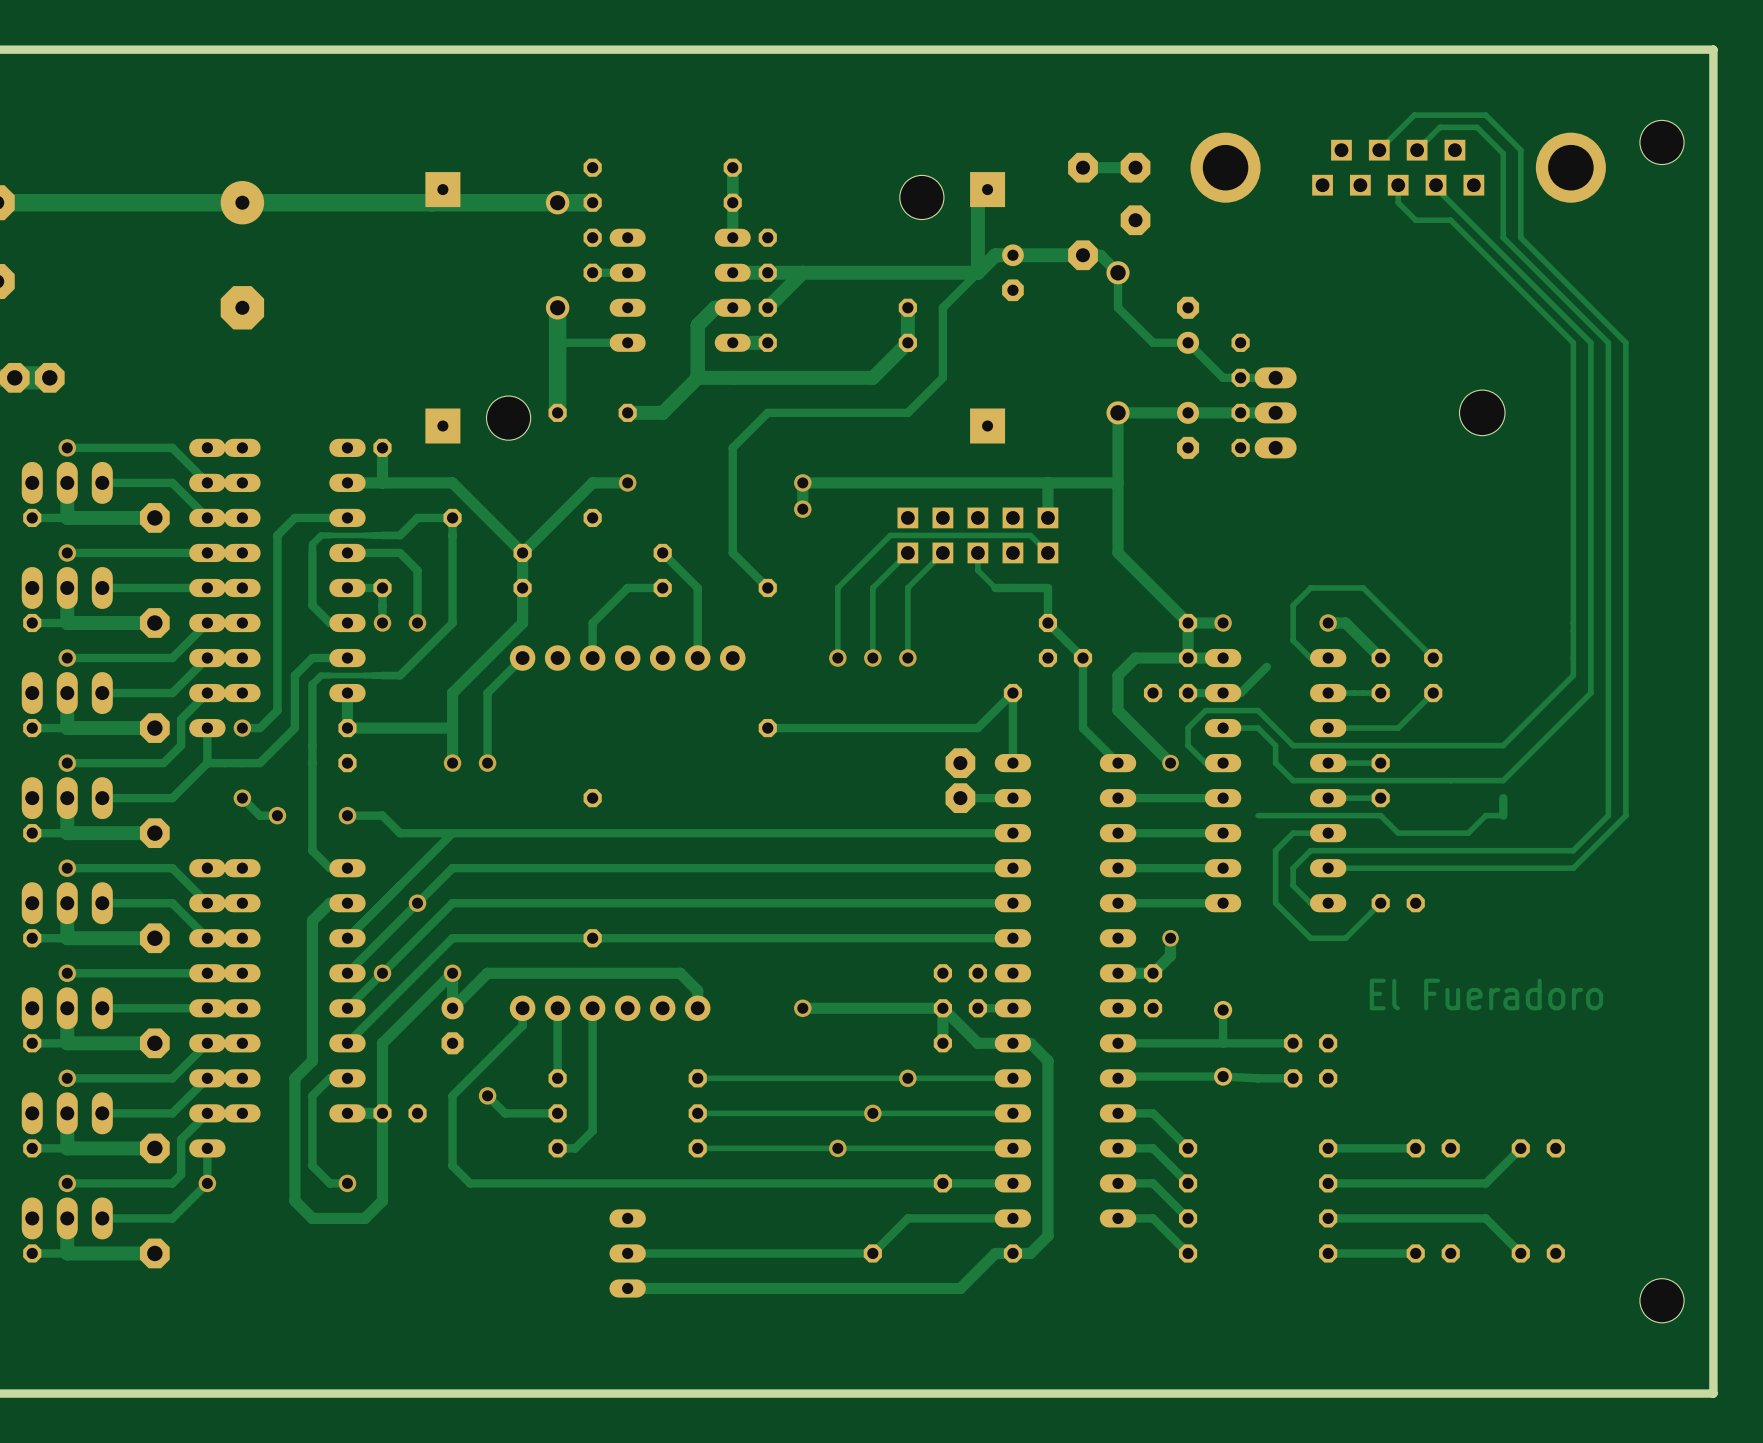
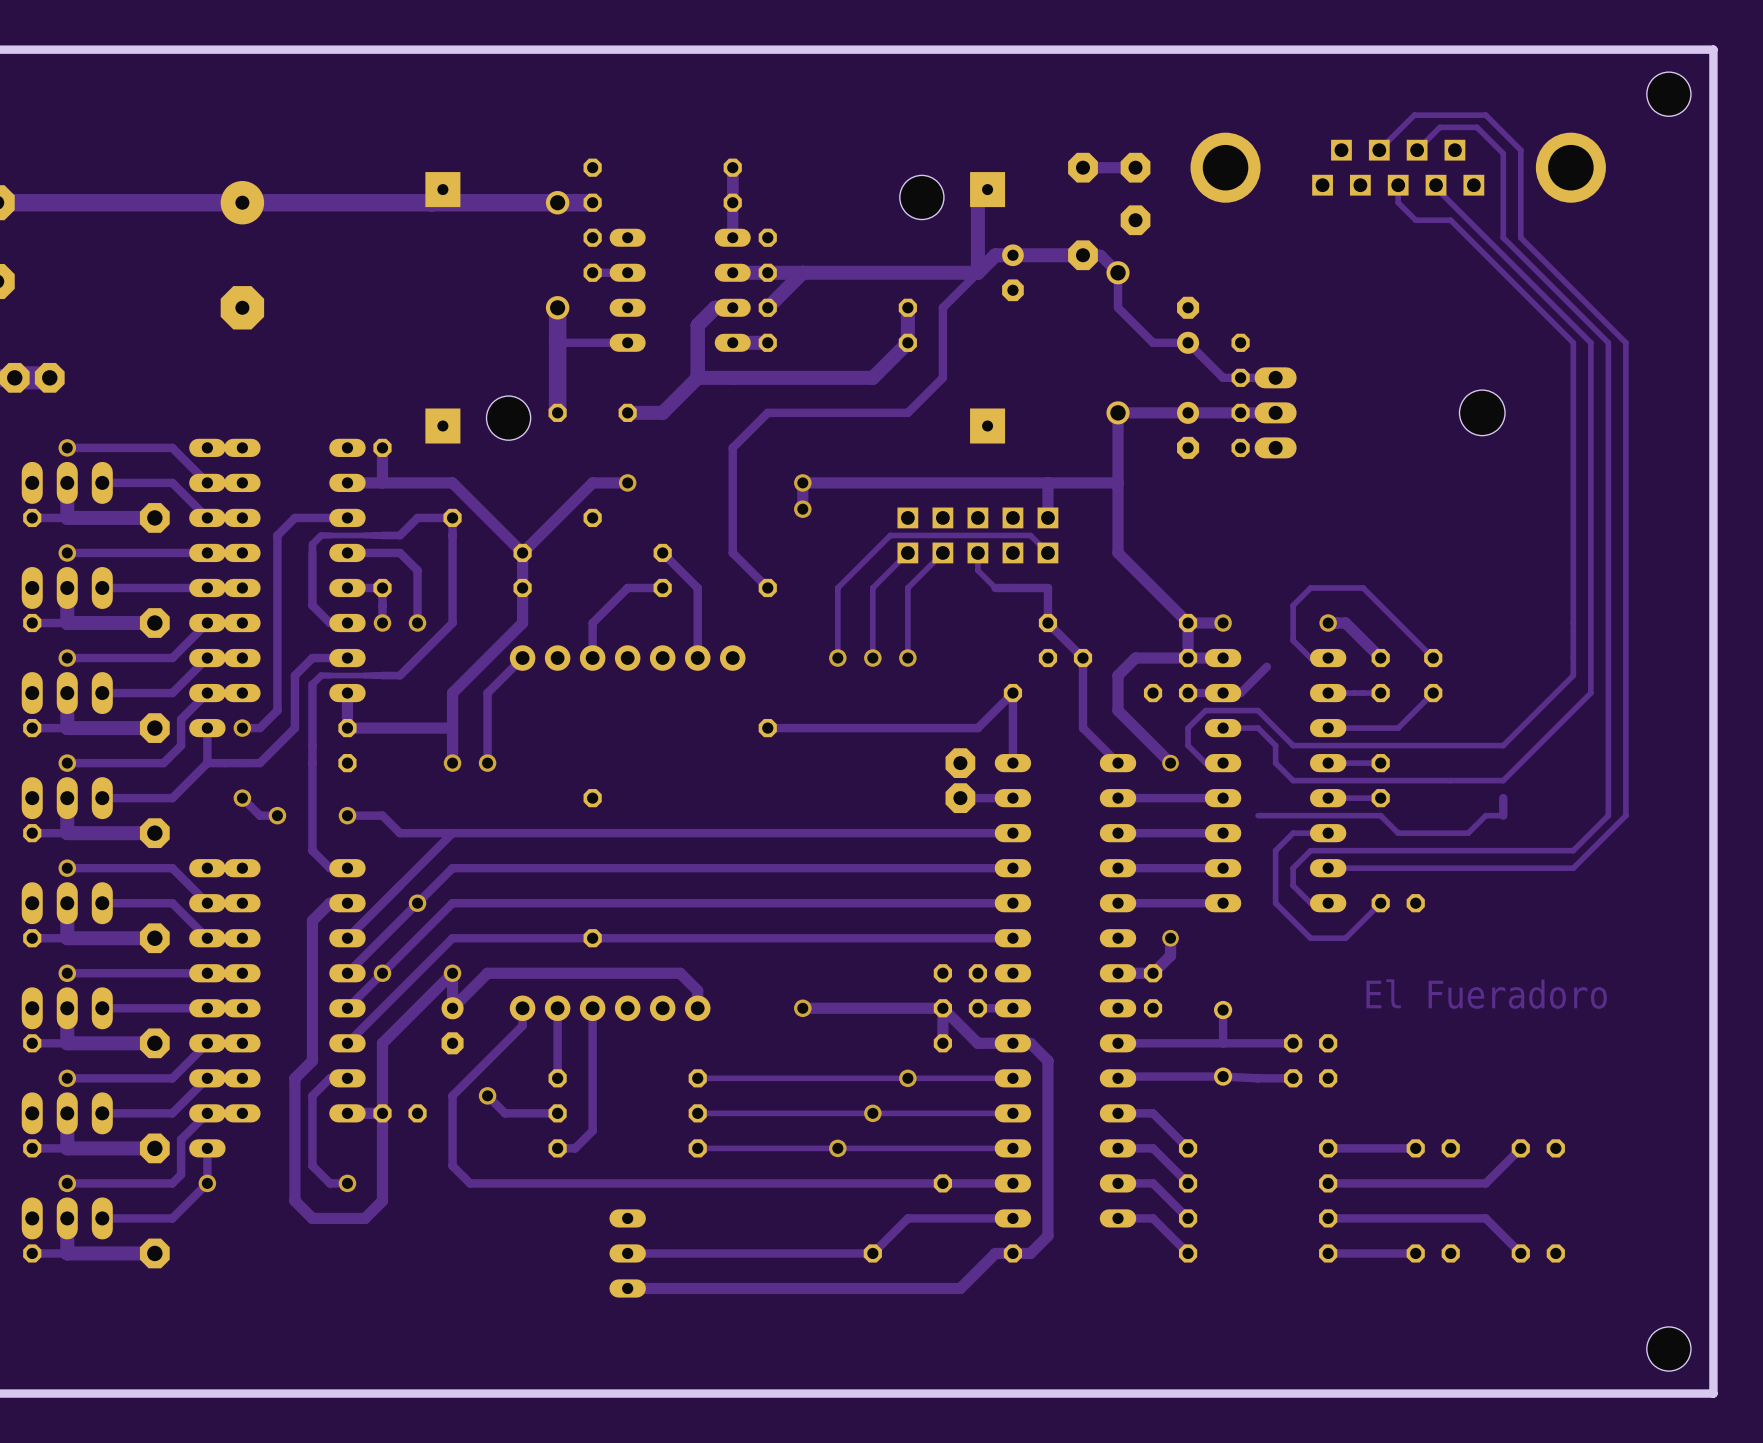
hole position: (1662, 142) -> (1668, 94)
hole position: (1662, 1300) -> (1668, 1349)

